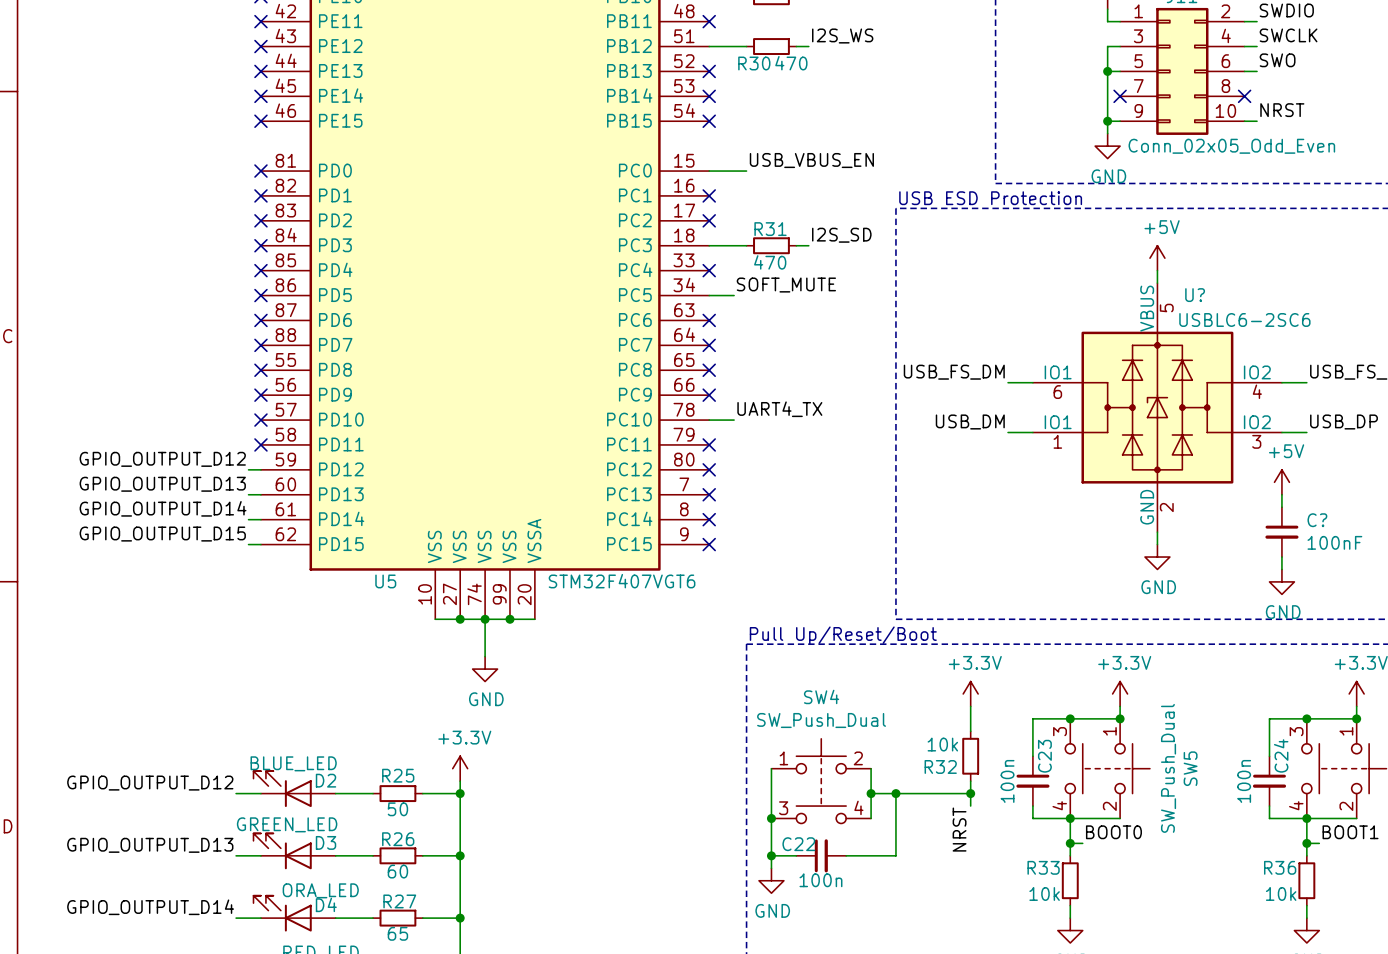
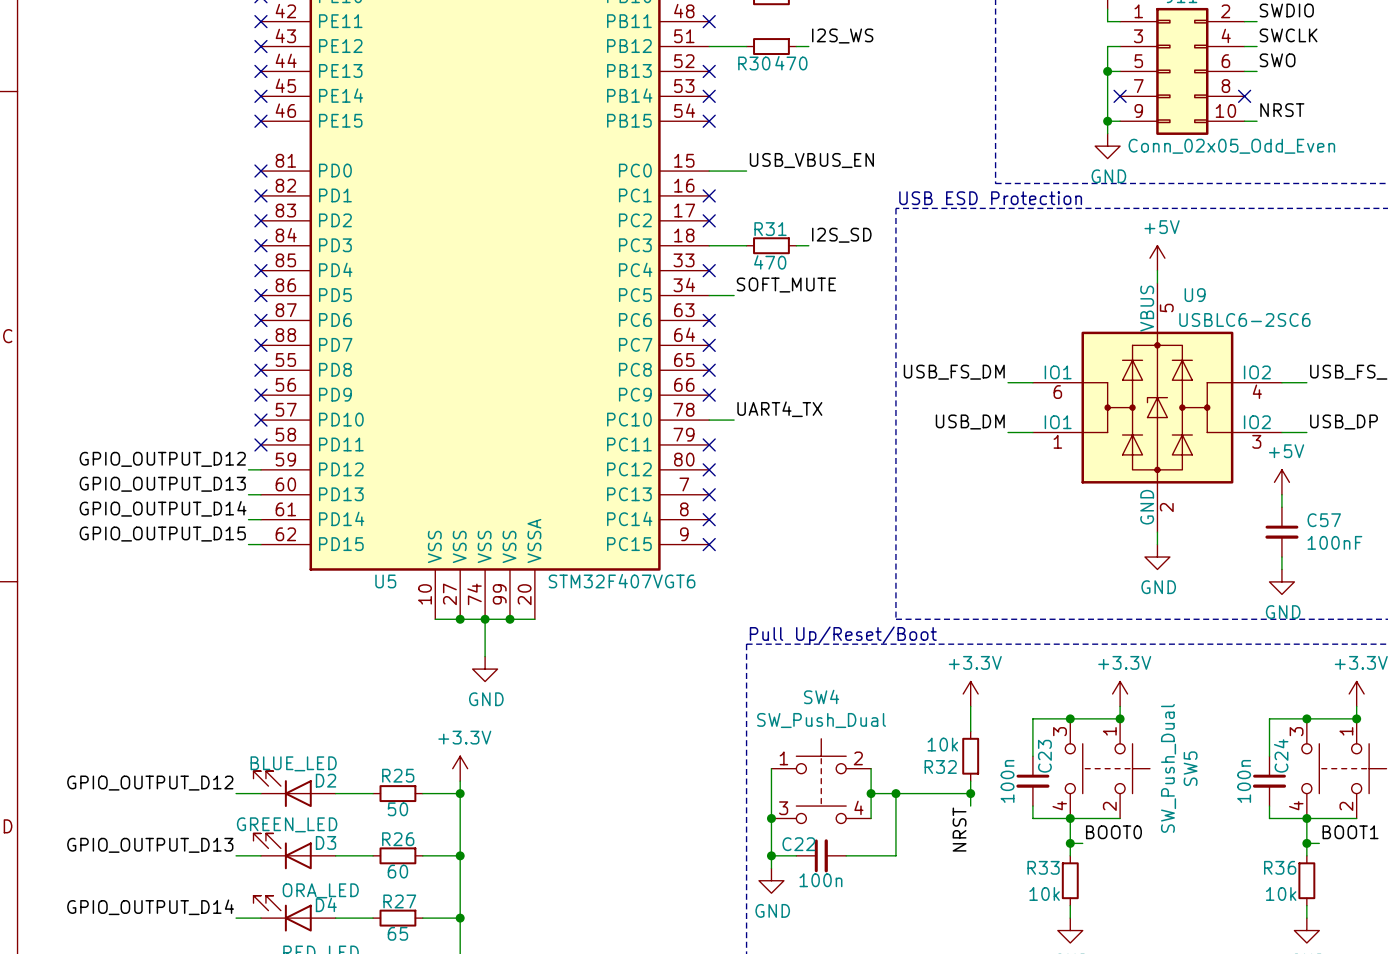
U? name: U? (1195, 295) -> U9 (1195, 295)
C? name: C? (1317, 520) -> C57 (1324, 520)

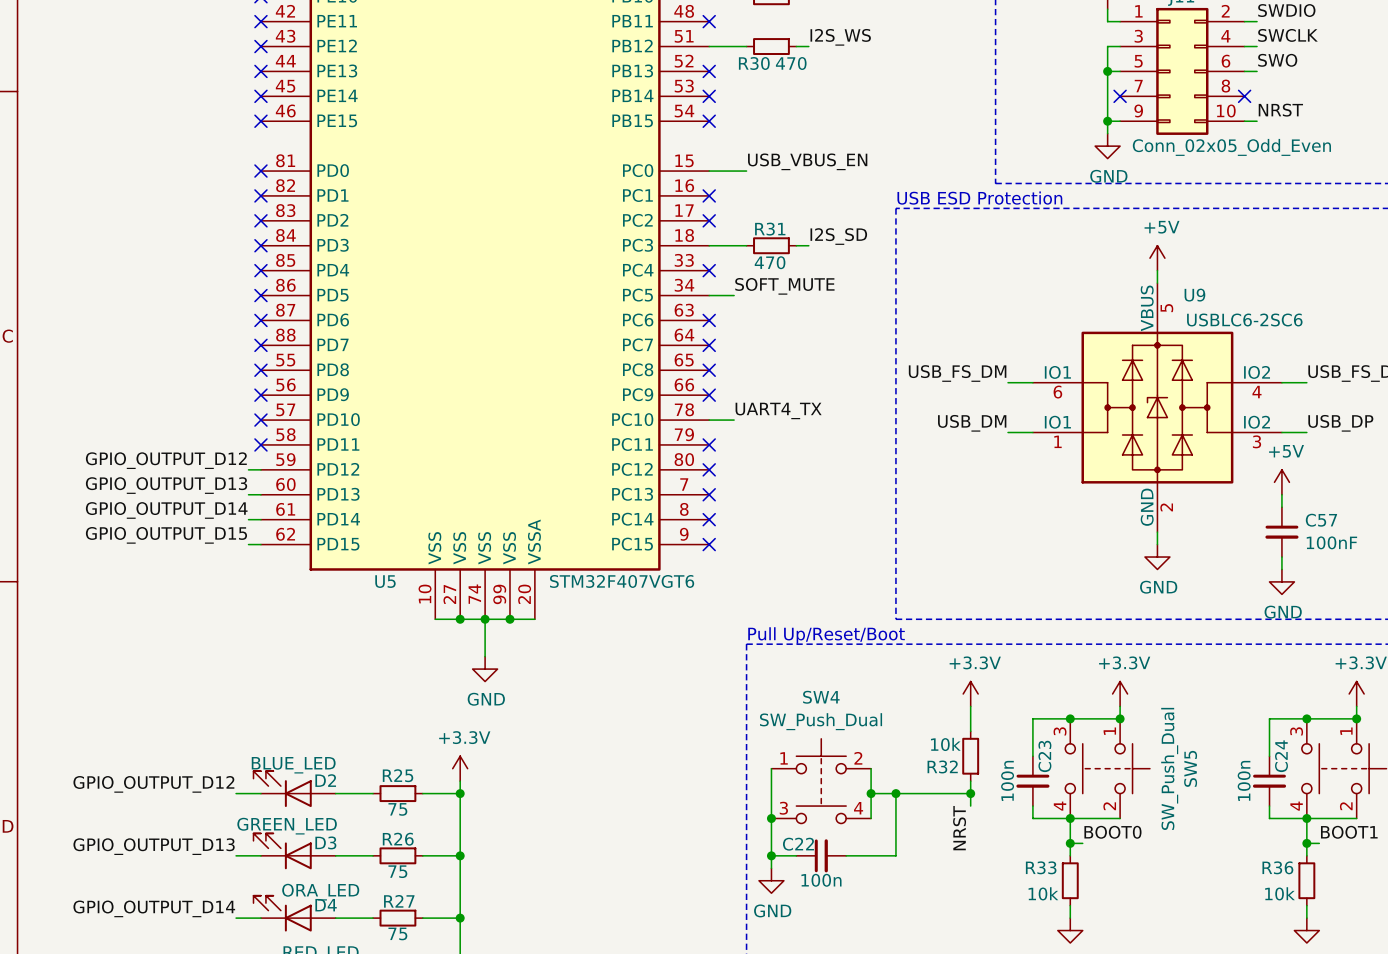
R25 value: 50 (397, 809) -> 75 (397, 809)
R26 value: 60 (397, 871) -> 75 (397, 871)
R27 value: 65 (397, 933) -> 75 (397, 933)

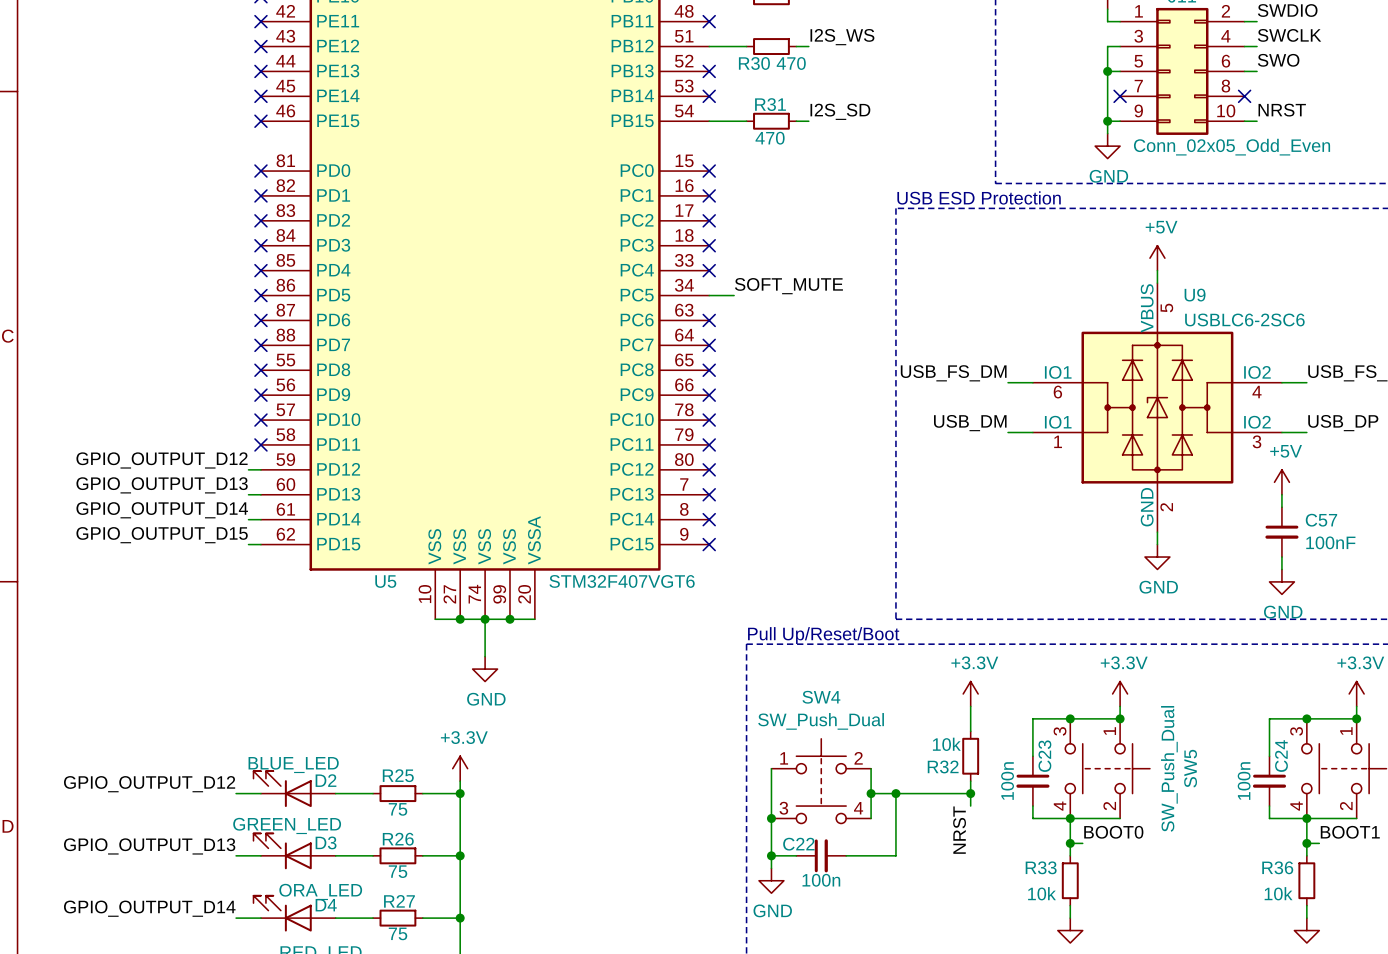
no-connect mark position: (709, 121) -> (709, 171)
label: USB_VBUS_EN (807, 161) -> none
wire: (709, 171) (746, 171) -> (709, 121) (746, 121)
label position: I2S_SD (838, 236) -> I2S_SD (840, 111)
wire: (709, 245) (746, 245) -> none
no-connect mark: none -> (709, 245)
R31 position: (771, 245) -> (771, 121)
wire: (796, 245) (808, 245) -> (796, 121) (808, 121)
label: UART4_TX (778, 410) -> none
wire: (709, 420) (734, 420) -> none
no-connect mark: none -> (709, 420)

